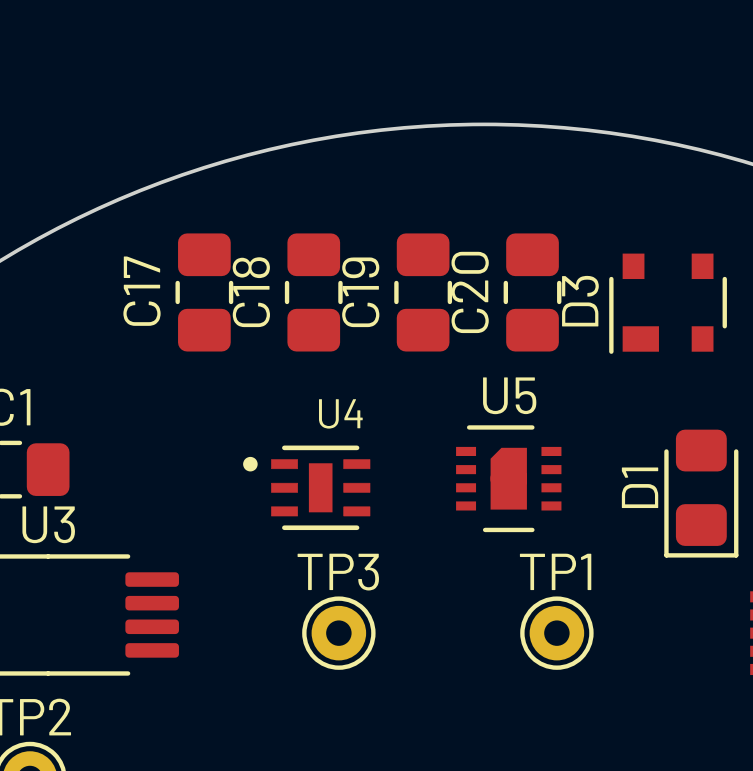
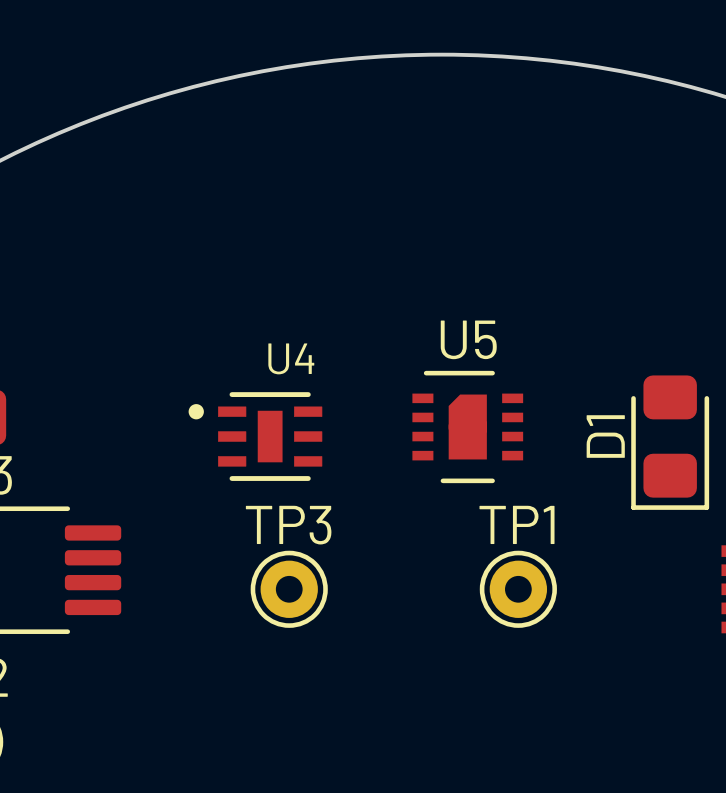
C17: (204, 292) -> none
C18: (313, 292) -> none
C19: (423, 292) -> none
C20: (532, 292) -> none
D3: (668, 303) -> none

